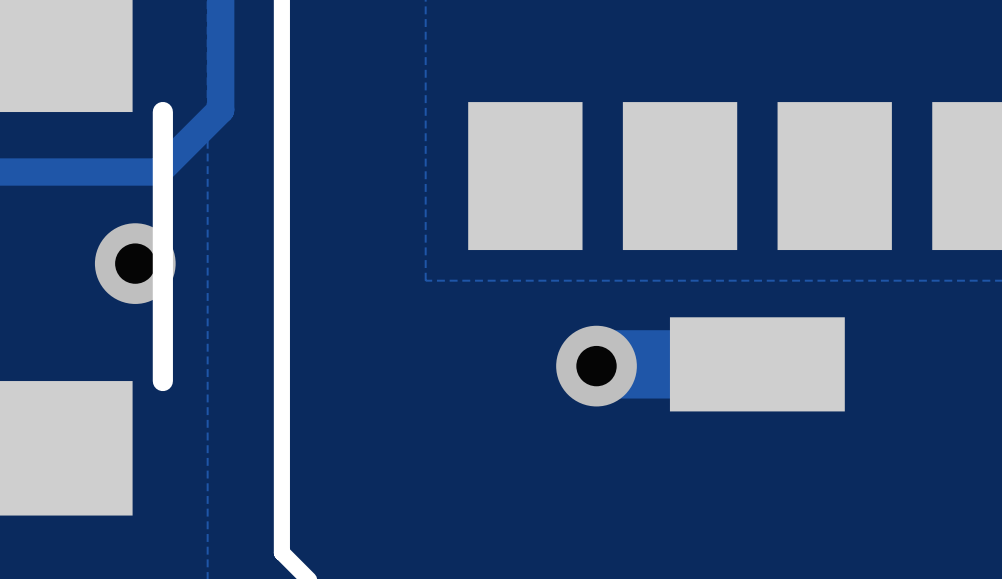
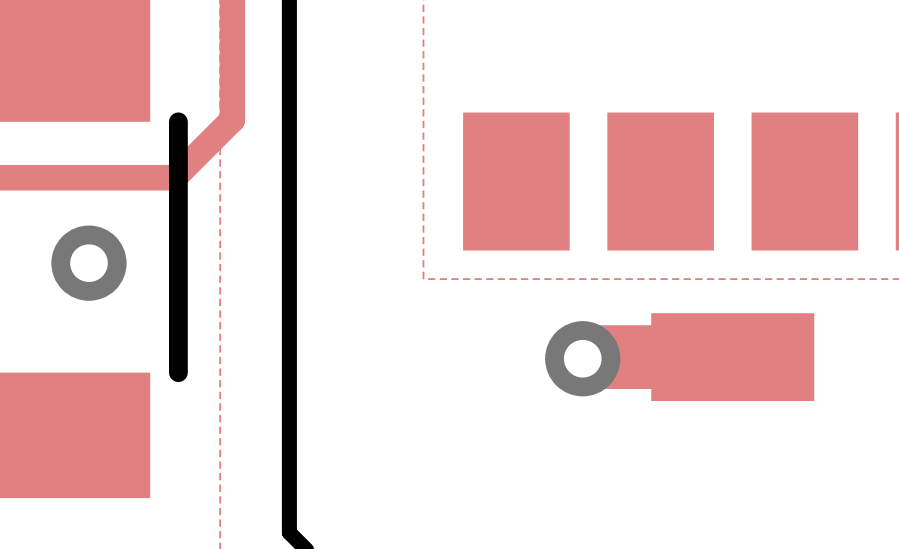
via position: (135, 263) -> (88, 263)

